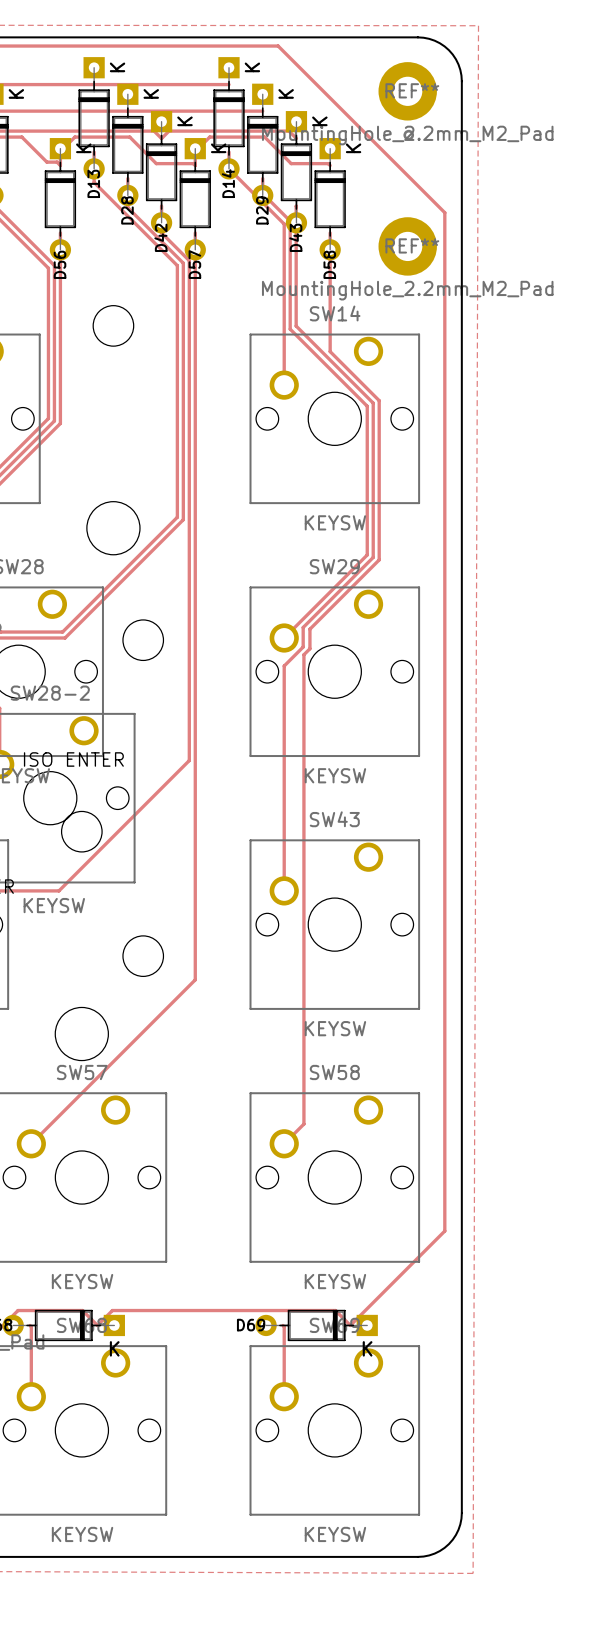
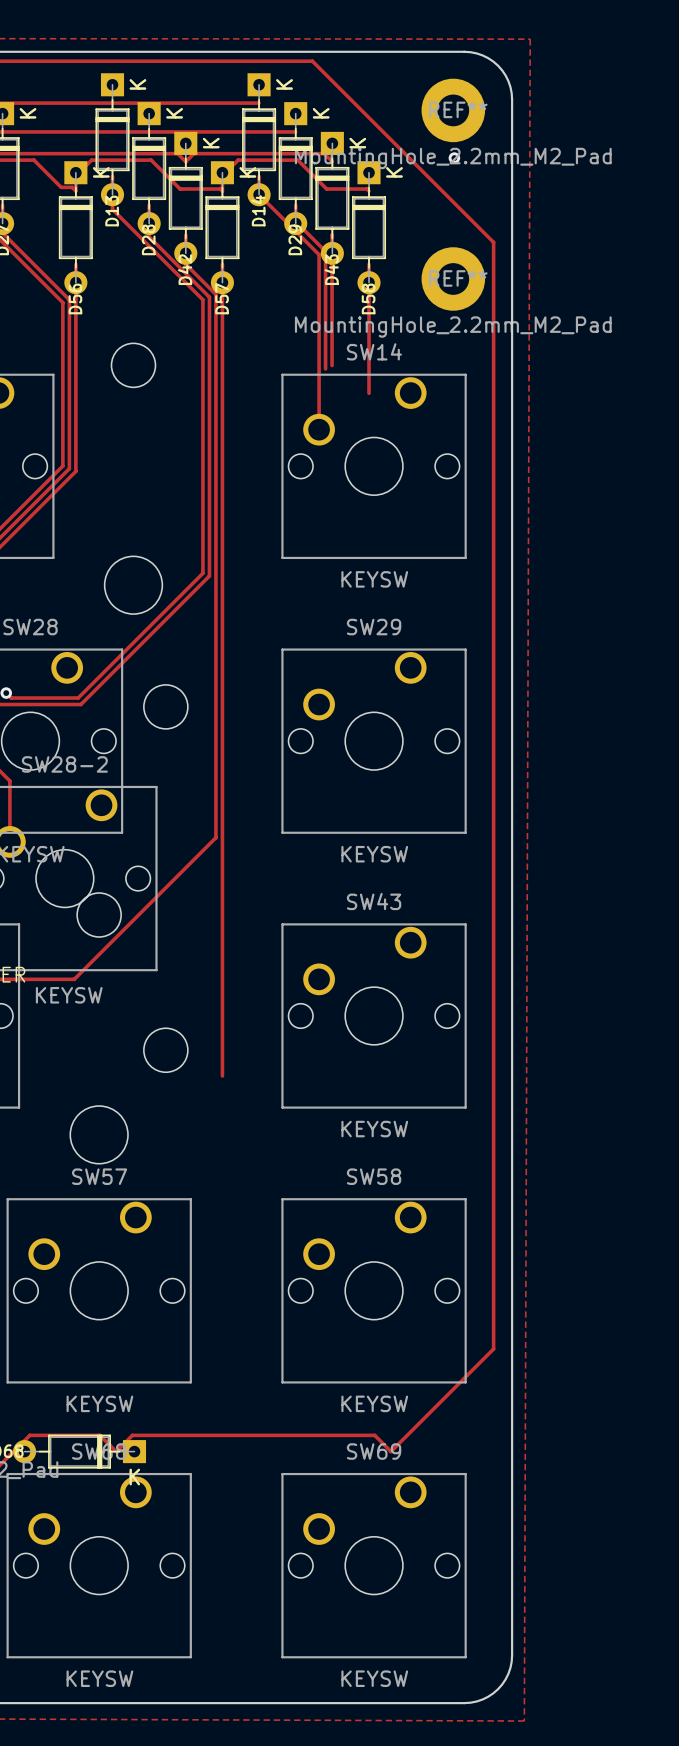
track: (296, 326) (373, 403) (373, 557) (303, 627) (303, 647) (284, 666) (284, 890) -> none
track: (290, 329) (367, 406) (367, 554) (284, 638) -> none
track: (330, 351) (379, 400) (379, 559) (309, 629) (309, 648) (303, 654) (303, 1124) (284, 1143) -> none
text: ISO ENTER (73, 759) -> none
track: (195, 979) (31, 1143) -> none
track: (30, 1325) (31, 1396) -> none
track: (282, 1325) (284, 1396) -> none
D69: (316, 1325) -> none

